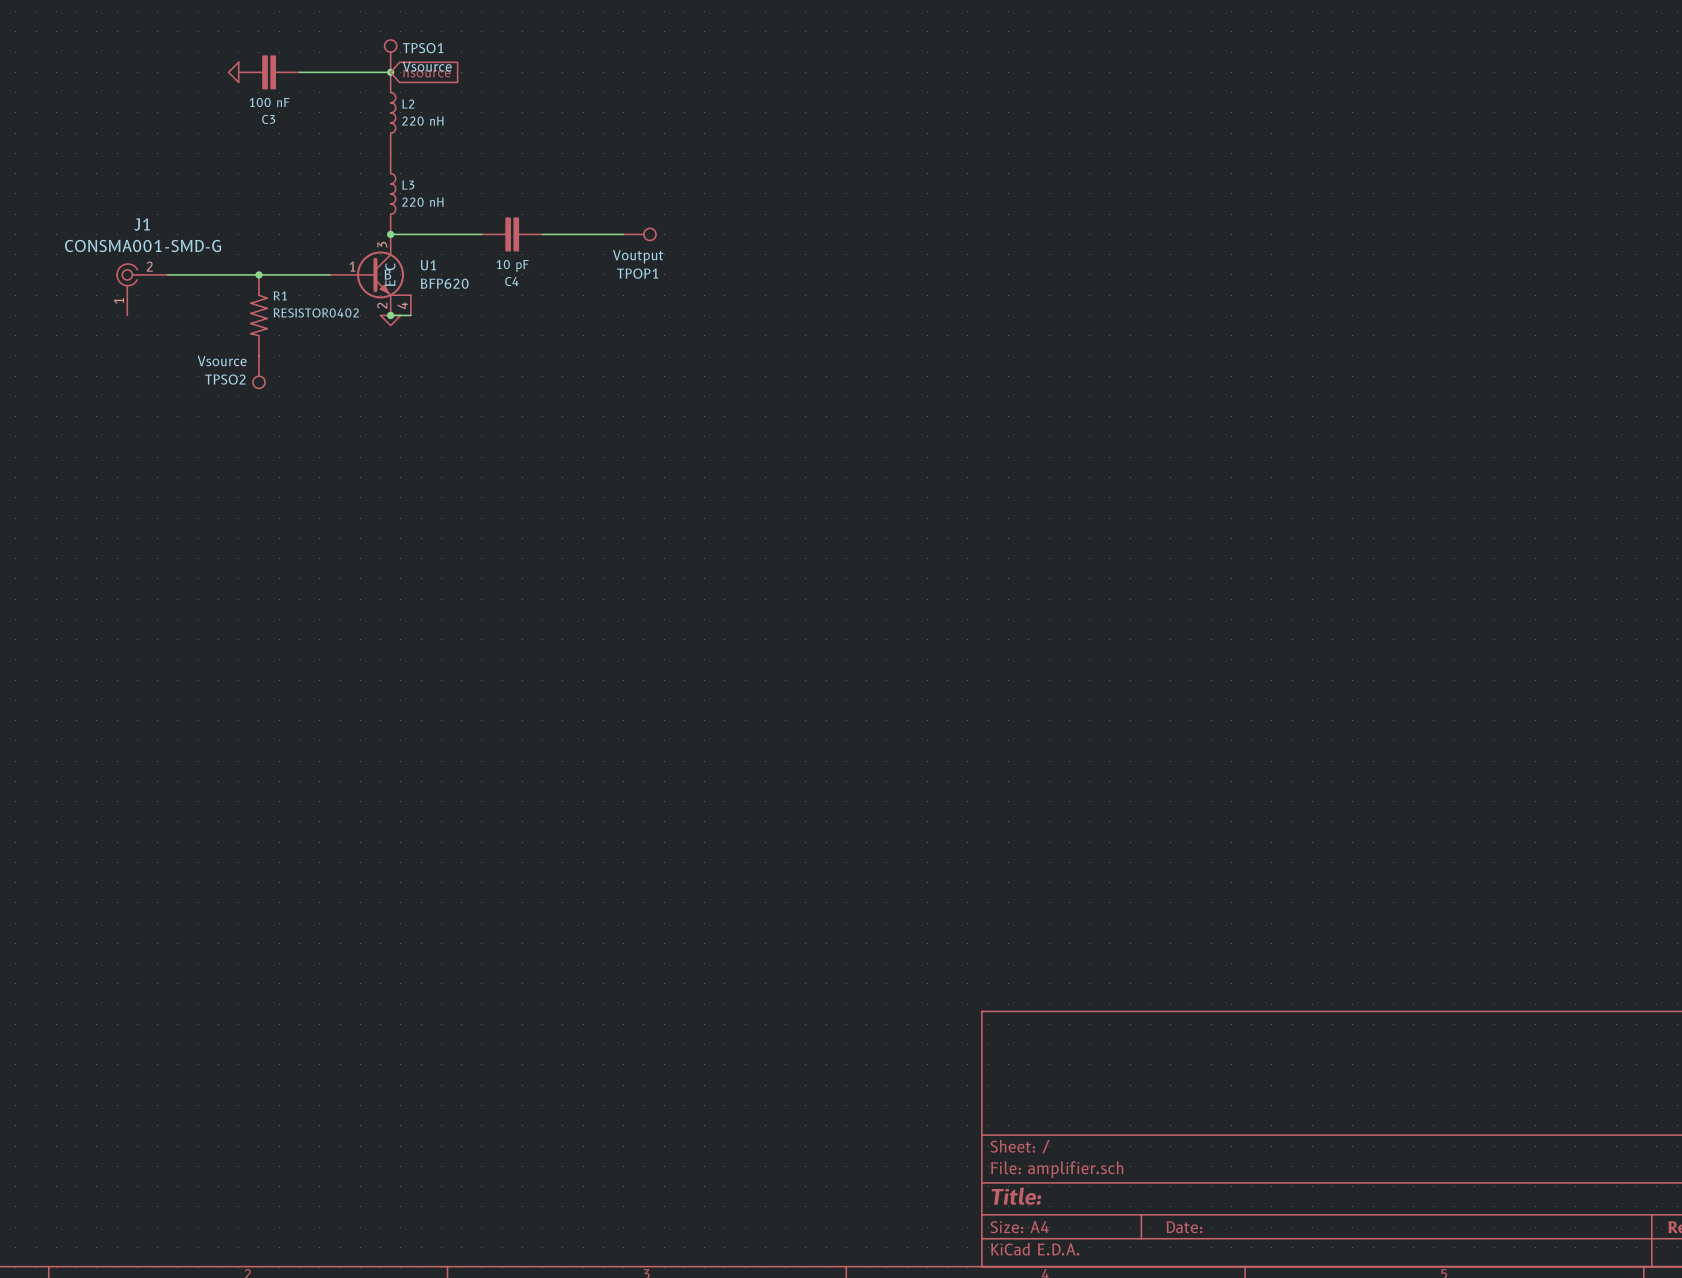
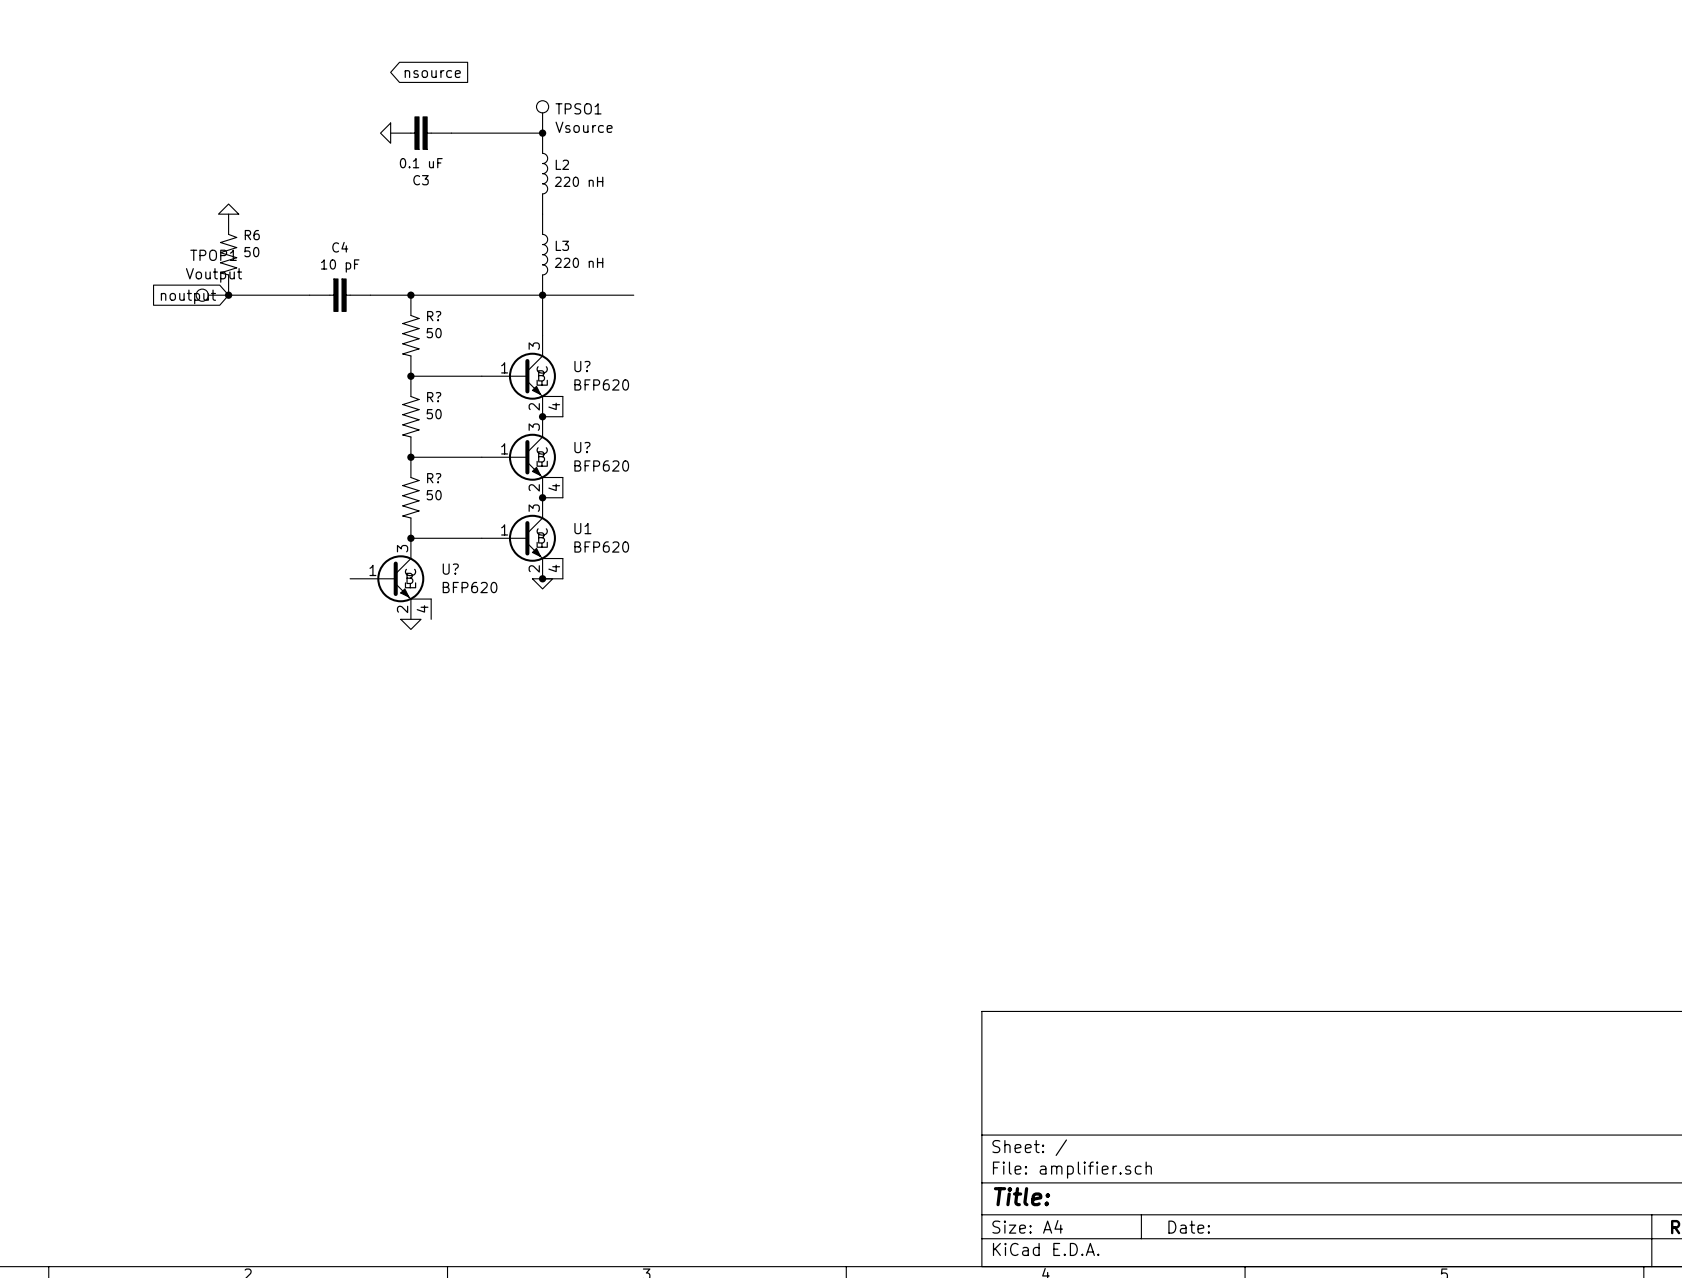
TPSO1 position: (390, 56) -> (542, 116)
power symbol: (233, 72) -> none
C3 position: (269, 72) -> (421, 133)
wire: (299, 72) (390, 72) -> none
junction: (390, 72) -> none
C3 value: 100 nF (269, 102) -> 0.1 uF (421, 163)
L2 position: (393, 112) -> (545, 173)
power symbol: none -> (385, 133)
junction: none -> (542, 133)
L3 position: (393, 193) -> (545, 254)
power symbol: none -> (228, 209)
wire: (390, 234) (481, 234) -> (451, 133) (542, 133)
junction: (390, 234) -> none
C4 position: (512, 234) -> (340, 295)
wire: (542, 234) (623, 234) -> none
TPOP1 position: (639, 234) -> (212, 295)
TPOP1 rotation: 0° (649, 234) -> 180° (202, 295)
R6: none -> 50 (228, 254)
C4 value position: 10 pF (512, 265) -> 10 pF (340, 265)
wire: (167, 274) (329, 274) -> none
junction position: (258, 274) -> (228, 295)
U1 position: (370, 274) -> (522, 538)
C4 name position: C4 (511, 281) -> C4 (340, 247)
J1: CONSMA001-SMD-G (142, 289) -> none
wire: none -> (228, 295) (309, 295)
wire: none -> (370, 295) (633, 295)
wire: none -> (542, 295) (542, 335)
junction: none -> (542, 295)
global label: none -> noutput (188, 296)
R1: RESISTOR0402 (258, 315) -> none
wire: (390, 315) (410, 315) -> (542, 416) (562, 416)
junction position: (390, 315) -> (410, 295)
power symbol: (390, 320) -> none
R?: none -> 50 (410, 335)
TPSO2: Vsource (258, 372) -> none
wire: none -> (410, 376) (481, 376)
junction: none -> (410, 376)
U?: none -> BFP620 (522, 376)
R?: none -> 50 (410, 416)
junction: none -> (542, 416)
wire: none -> (410, 457) (481, 457)
junction: none -> (410, 457)
U?: none -> BFP620 (522, 457)
R?: none -> 50 (410, 497)
wire: none -> (542, 497) (562, 497)
junction: none -> (542, 497)
wire: none -> (410, 538) (481, 538)
junction: none -> (410, 538)
U?: none -> BFP620 (390, 578)
wire: none -> (542, 578) (562, 578)
junction: none -> (542, 578)
power symbol: none -> (542, 583)
power symbol: none -> (410, 624)

